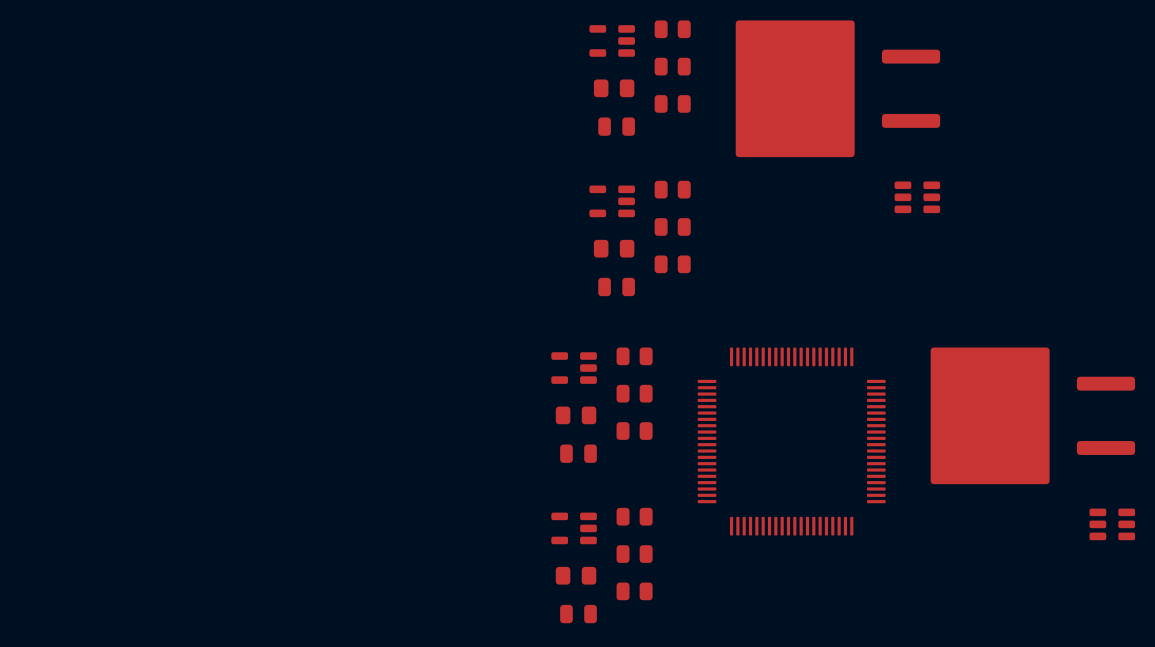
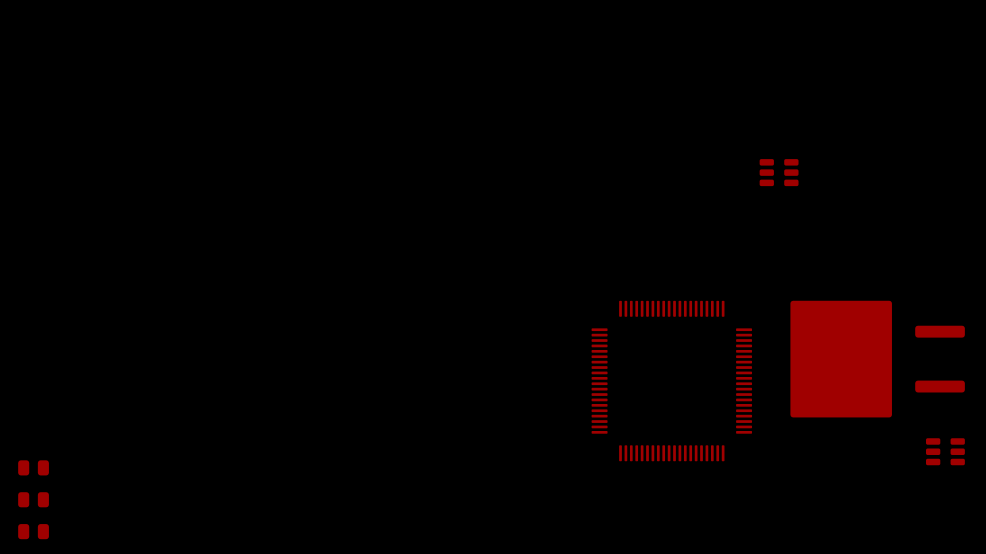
part: (672, 29) -> none
part: (612, 40) -> none
part: (672, 66) -> none
part: (614, 88) -> none
part: (837, 88) -> none
part: (672, 103) -> none
part: (616, 126) -> none
part: (672, 189) -> none
part: (612, 201) -> none
part: (672, 226) -> none
part: (614, 248) -> none
part: (672, 264) -> none
part: (616, 286) -> none
part: (634, 356) -> none
part: (574, 368) -> none
part: (634, 393) -> none
part: (576, 415) -> none
part: (634, 431) -> none
part: (578, 453) -> none
part: (634, 516) -> none
part: (574, 528) -> none
part: none -> (33, 467)
part: (634, 554) -> none
part: (576, 575) -> none
part: none -> (33, 499)
part: (634, 591) -> none
part: (578, 614) -> none
part: none -> (33, 531)

